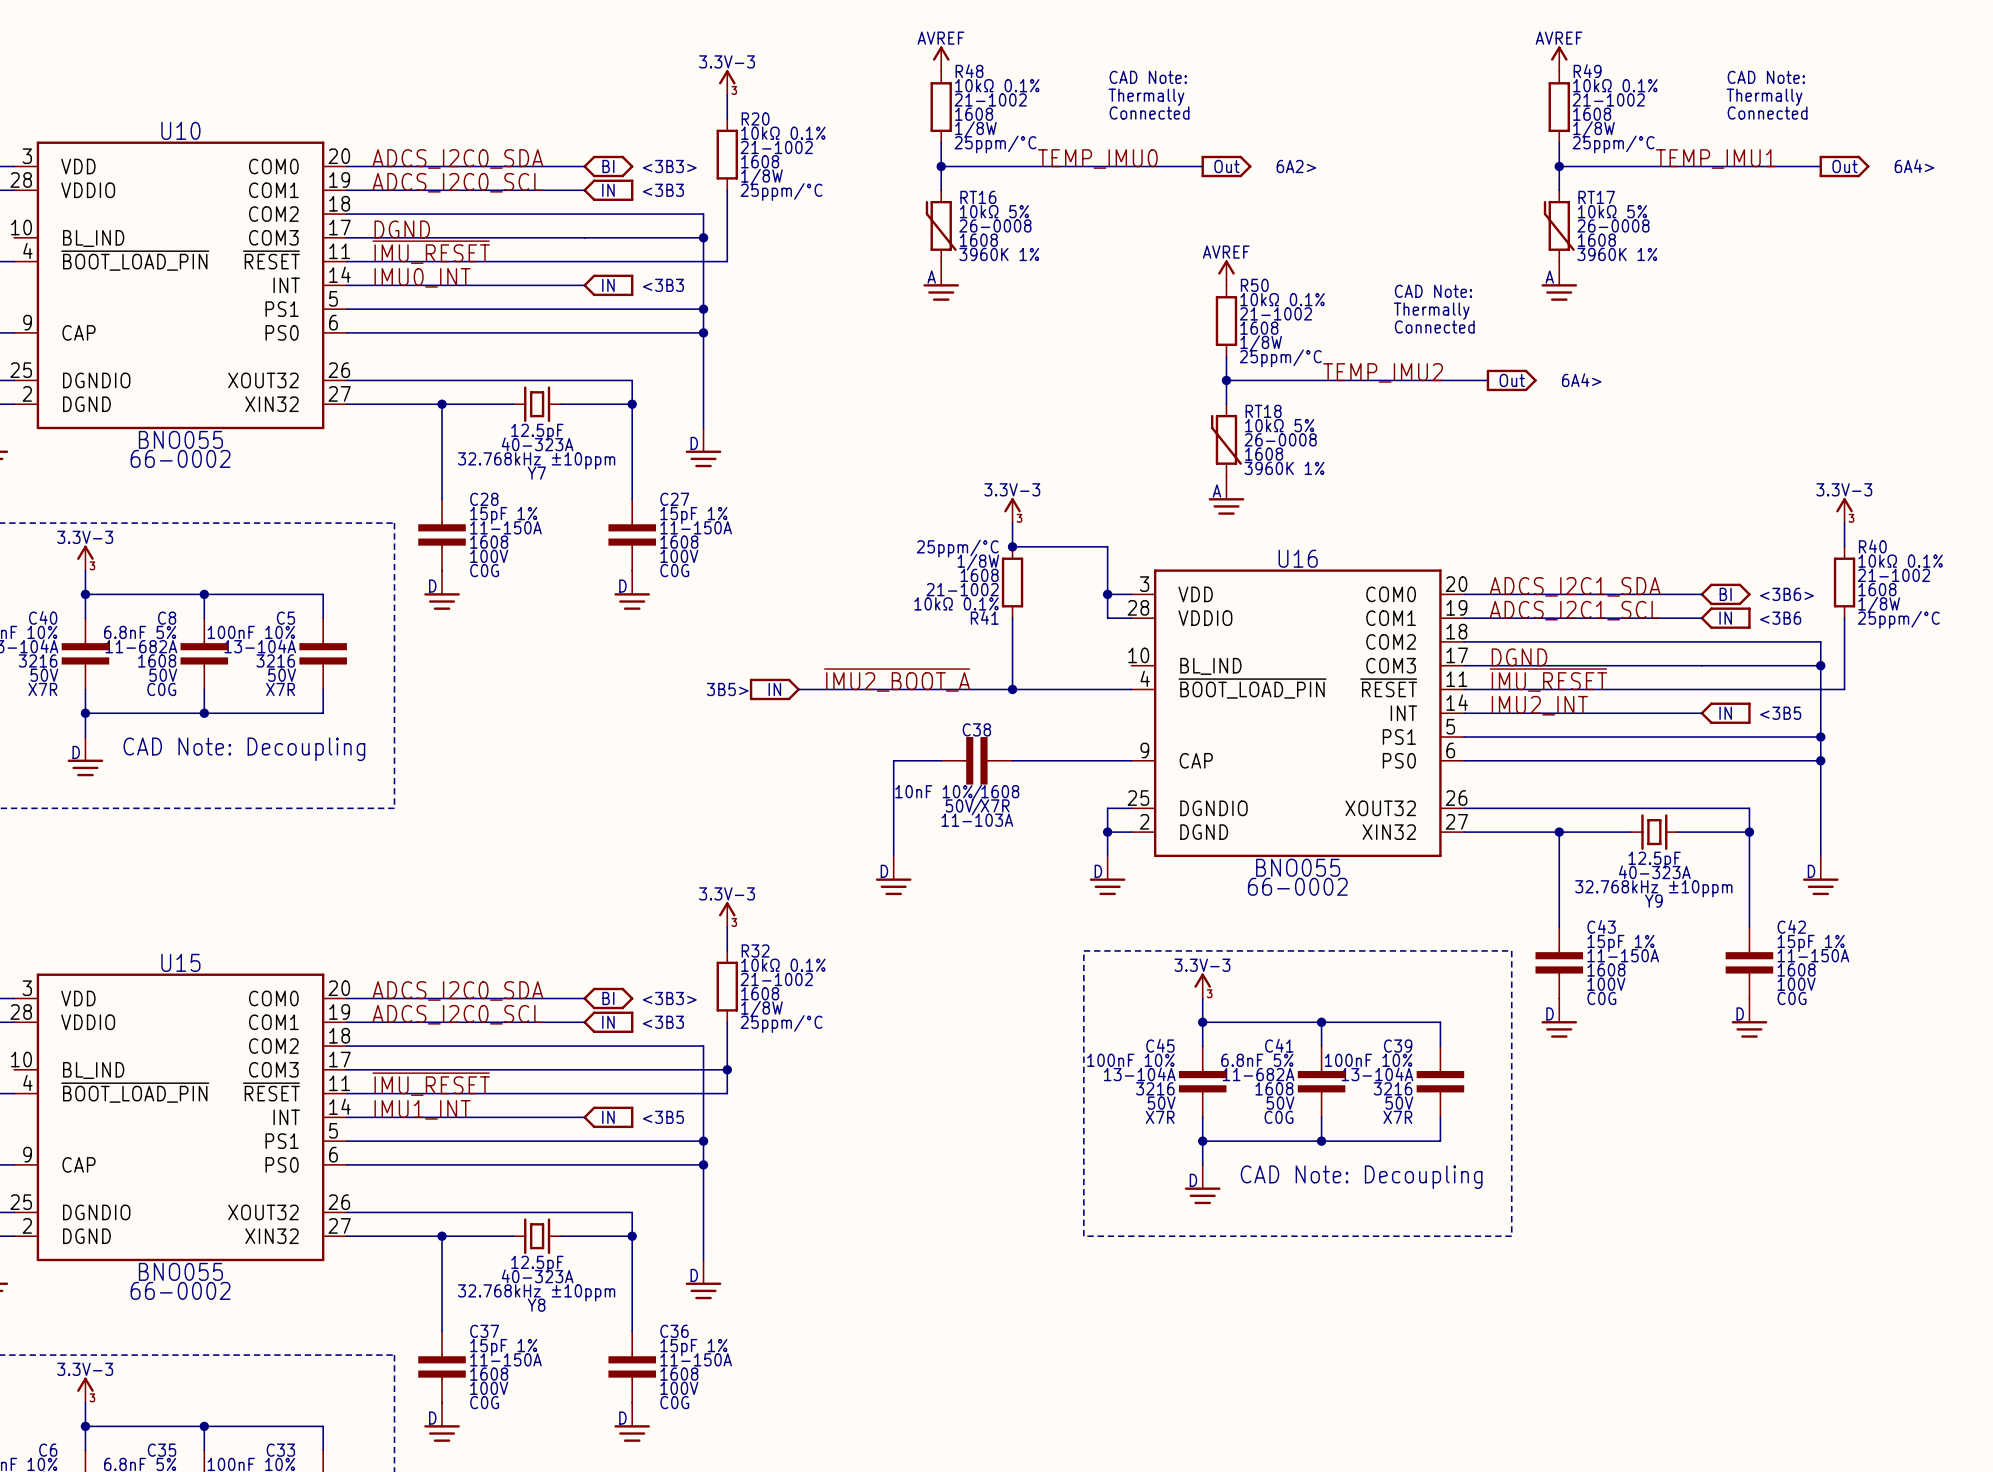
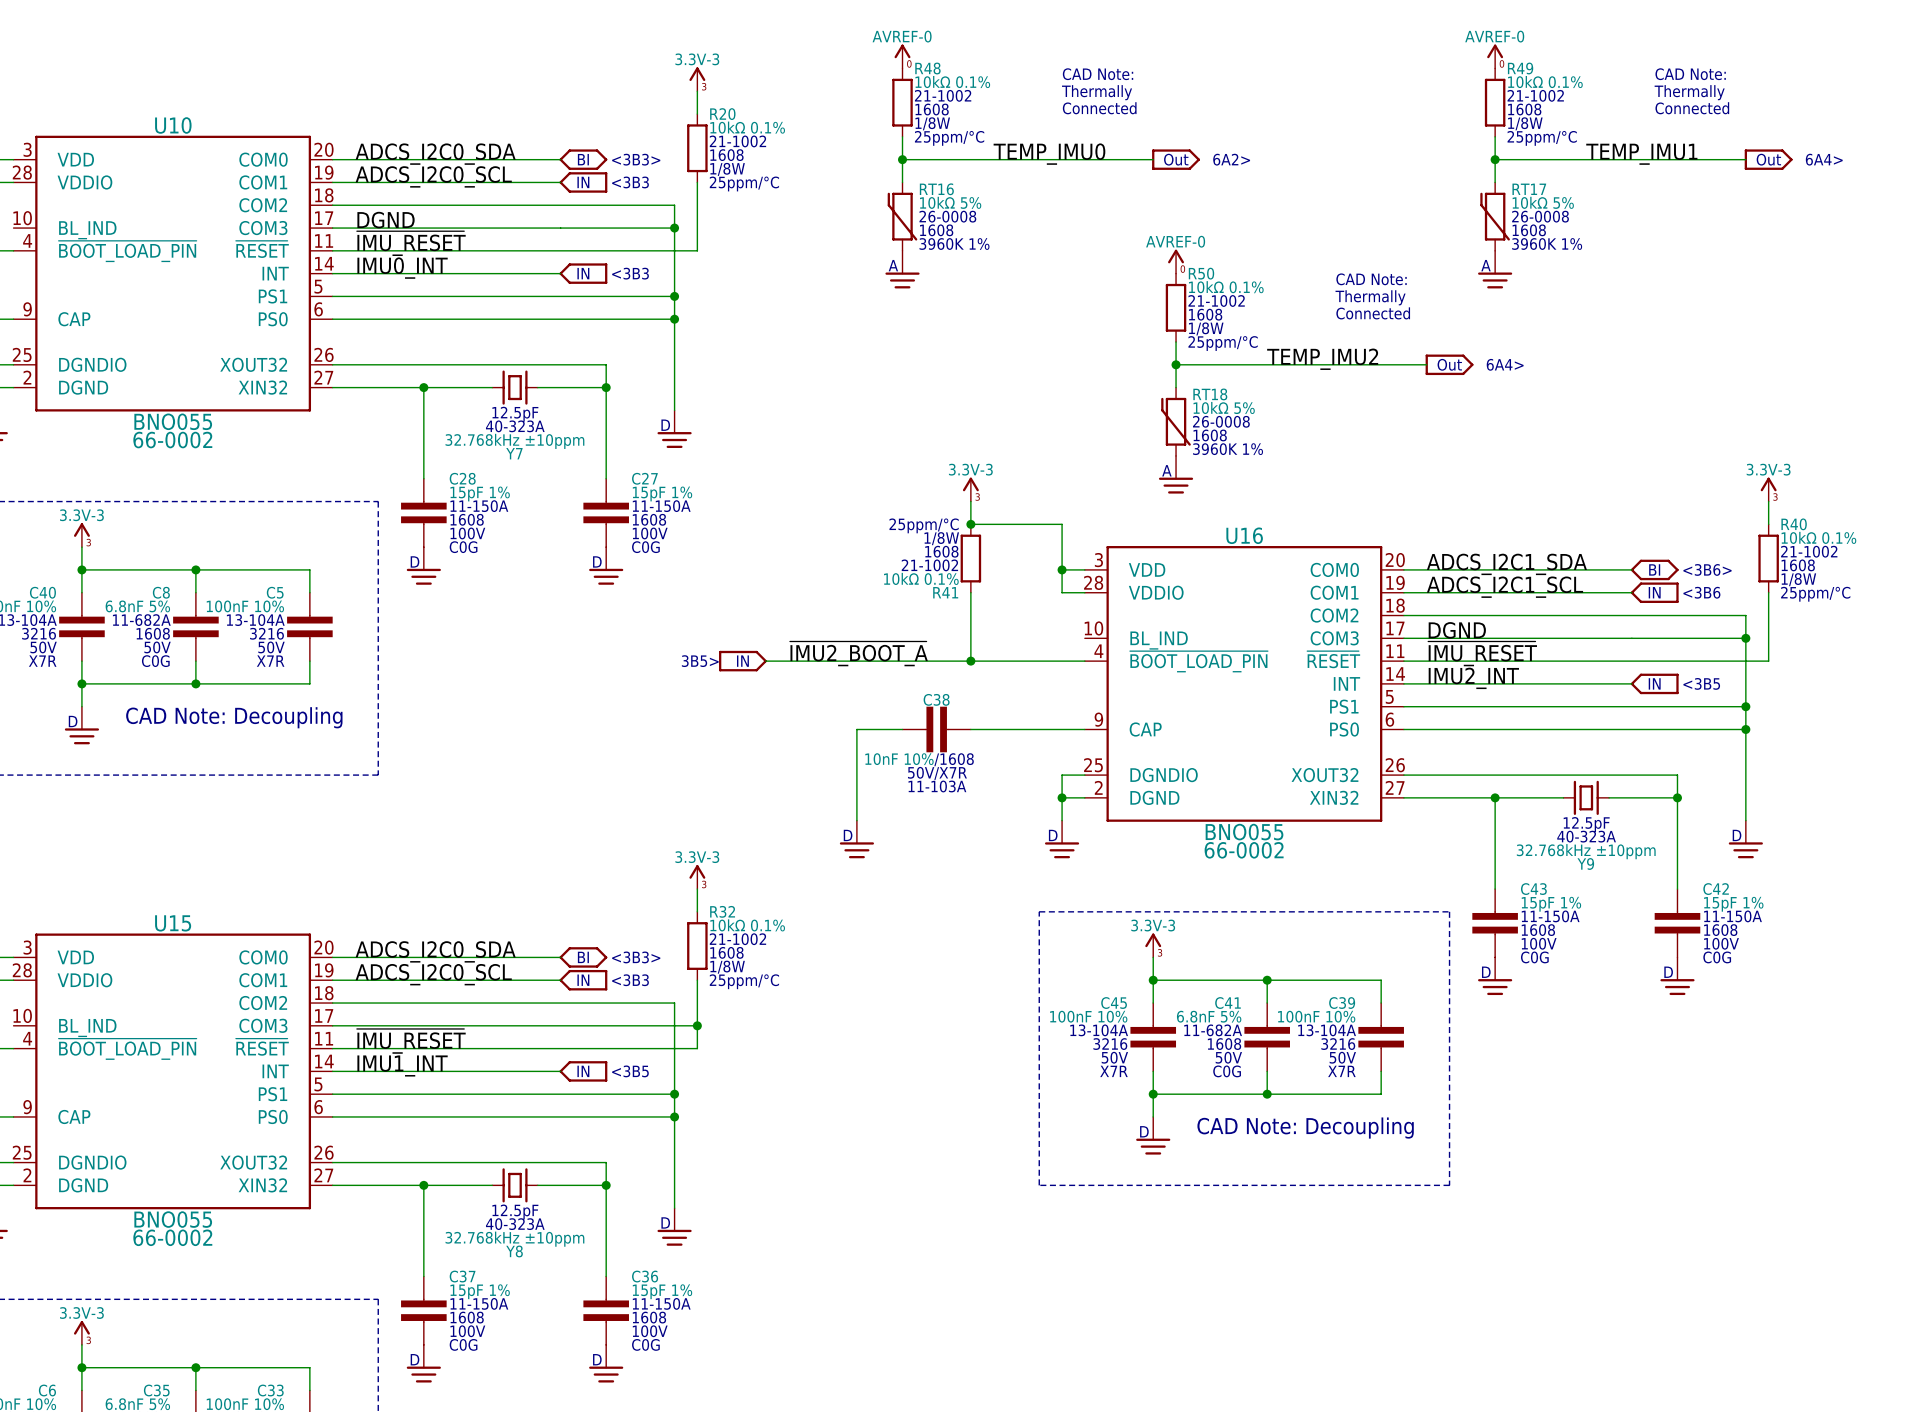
power symbol: AVREF (941, 58) -> AVREF-0 (902, 56)
power symbol: AVREF (1559, 58) -> AVREF-0 (1495, 56)
power symbol: AVREF (1226, 272) -> AVREF-0 (1176, 261)

